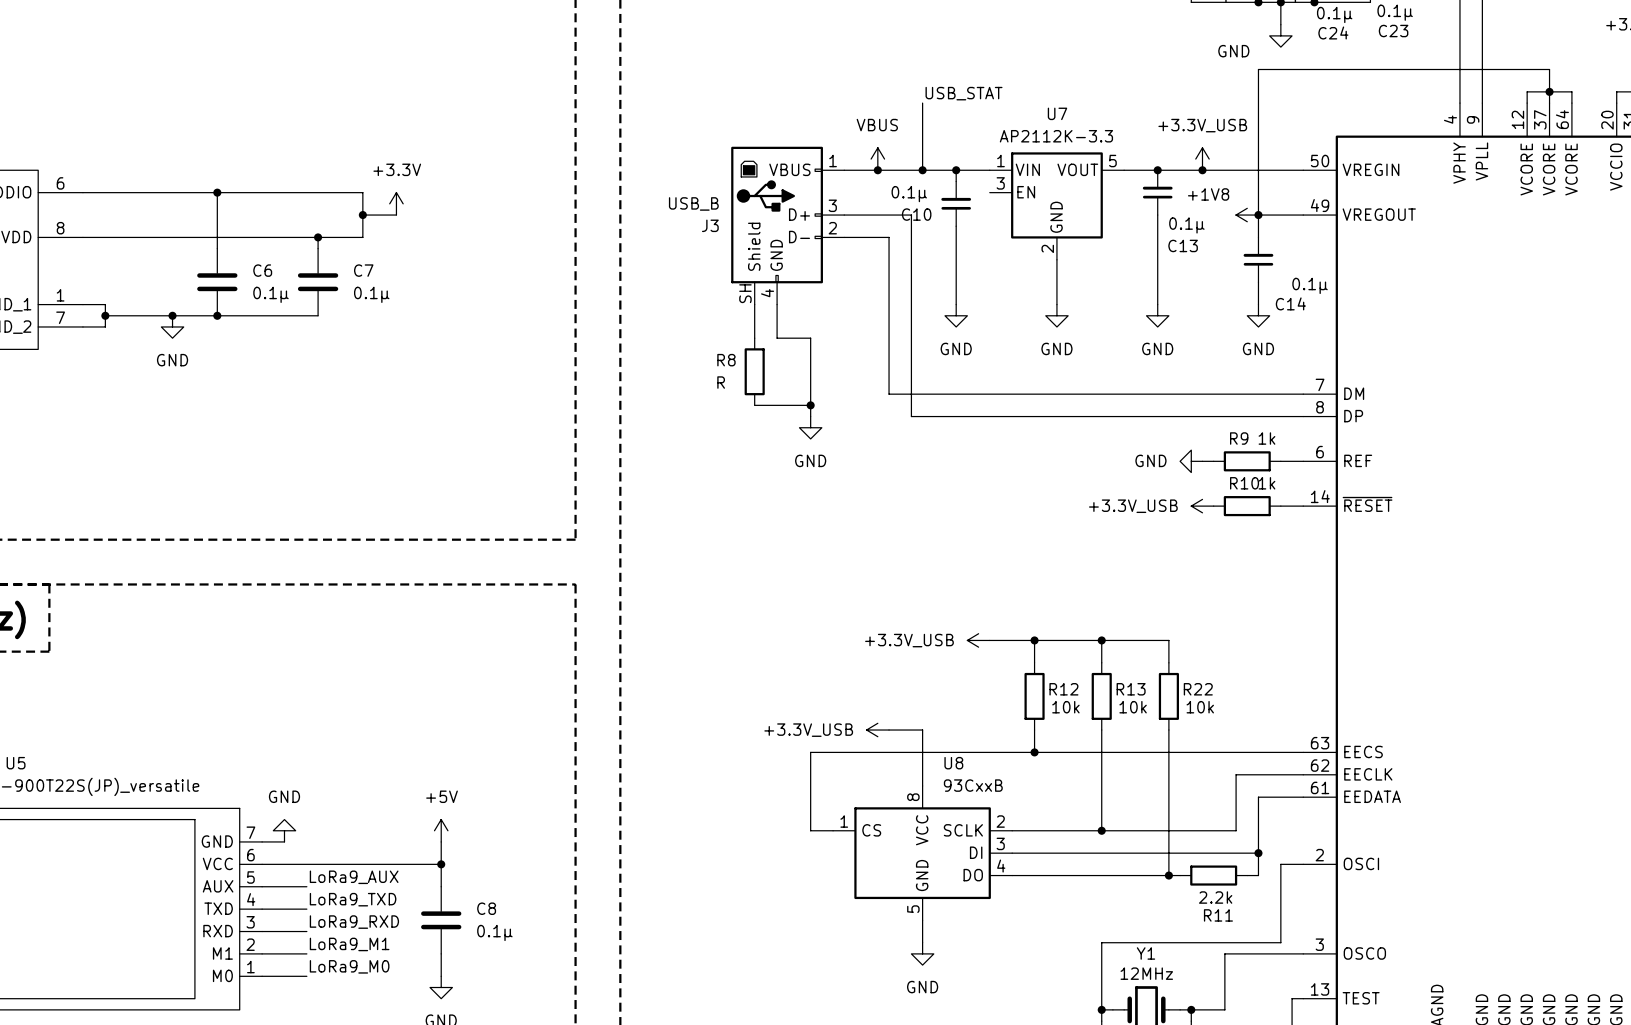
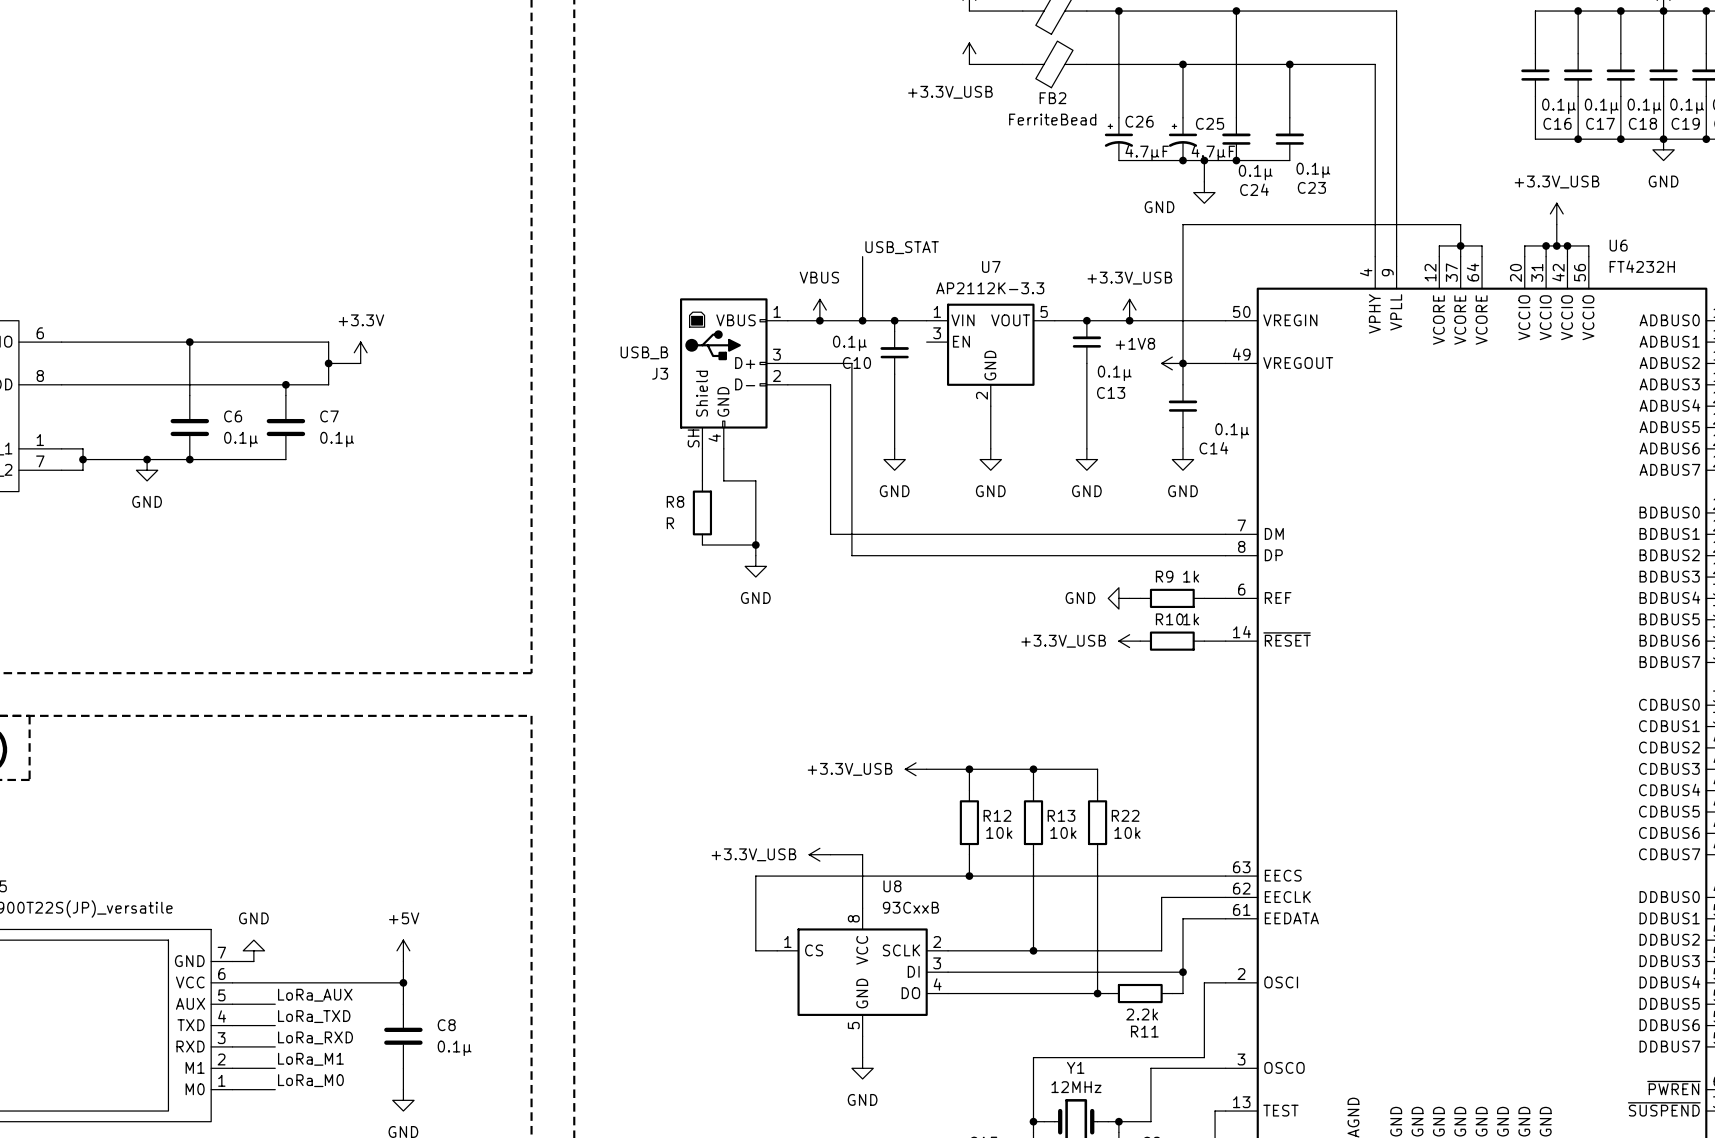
label: LoRa9_AUX (354, 877) -> LoRa_AUX (315, 995)
label: LoRa9_TXD (353, 899) -> LoRa_TXD (314, 1016)
label: LoRa9_RXD (354, 922) -> LoRa_RXD (315, 1037)
label: LoRa9_M1 (349, 944) -> LoRa_M1 (310, 1059)
label: LoRa9_M0 (349, 966) -> LoRa_M0 (310, 1080)

